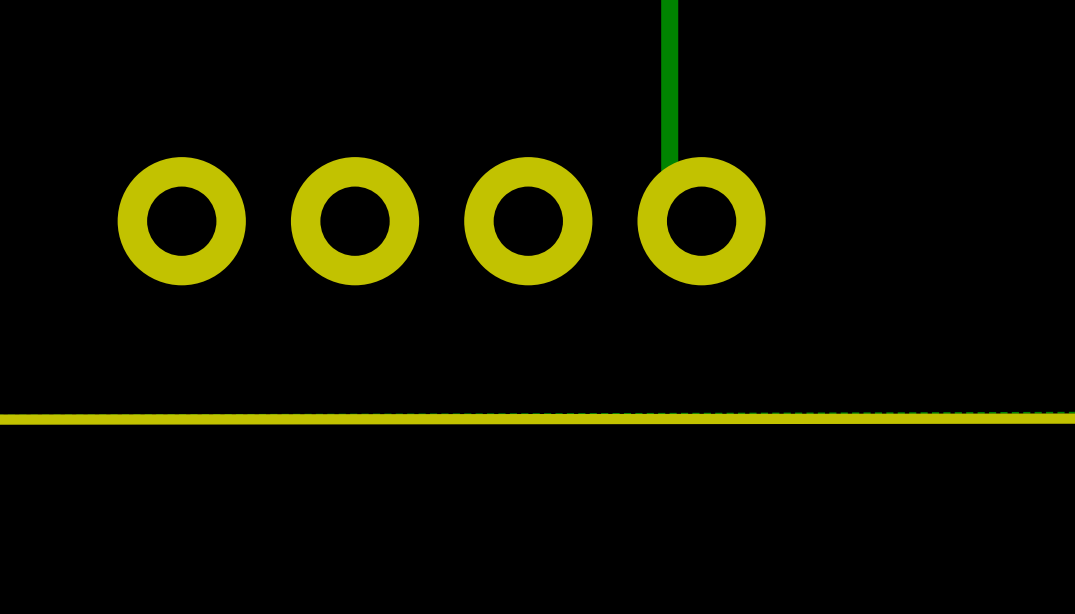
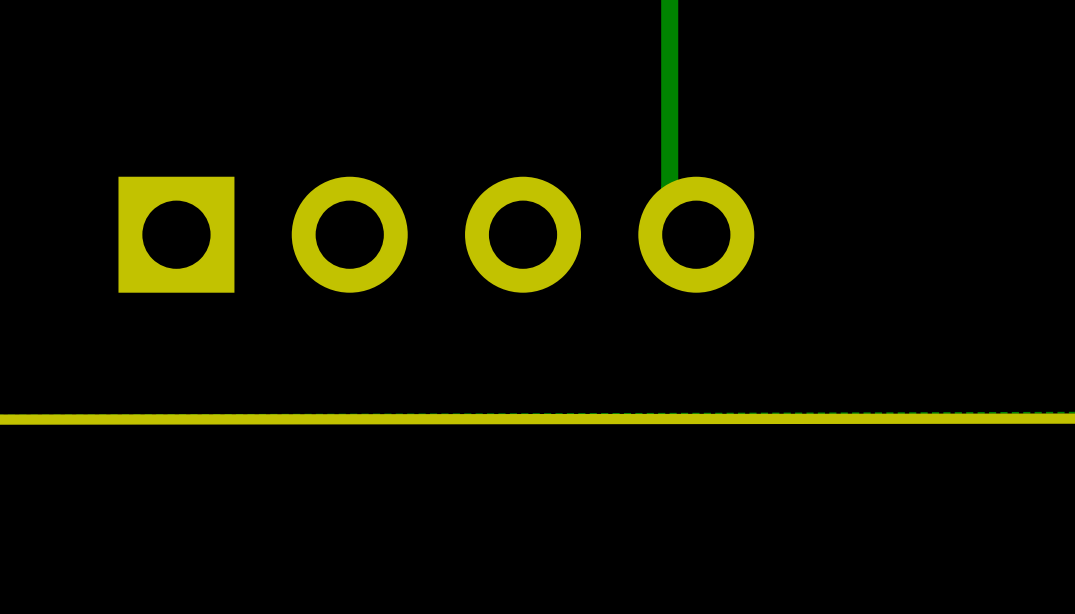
part footprint: [117, 157, 766, 286] -> [118, 176, 755, 293]

